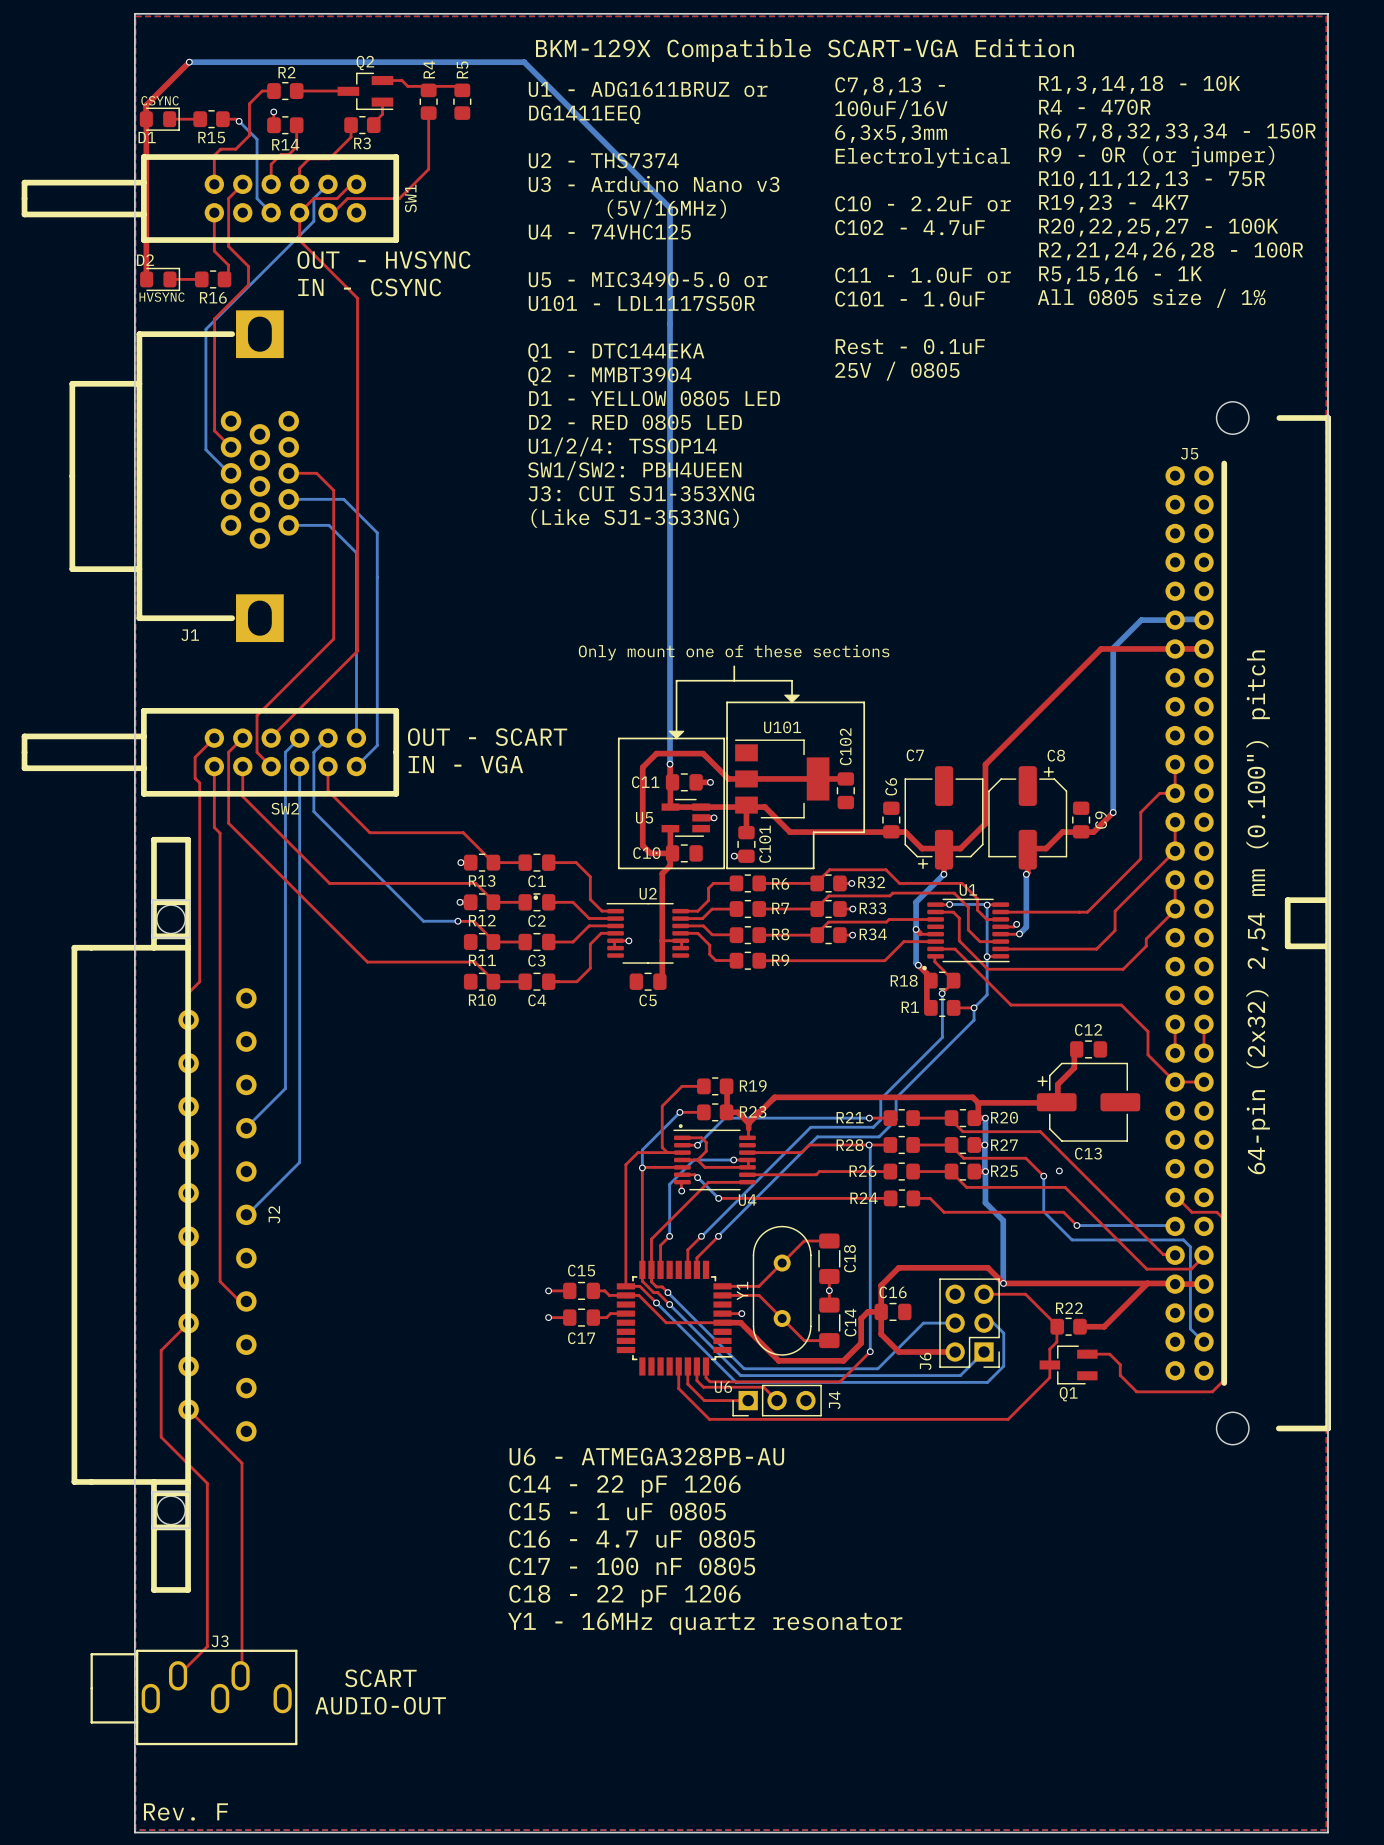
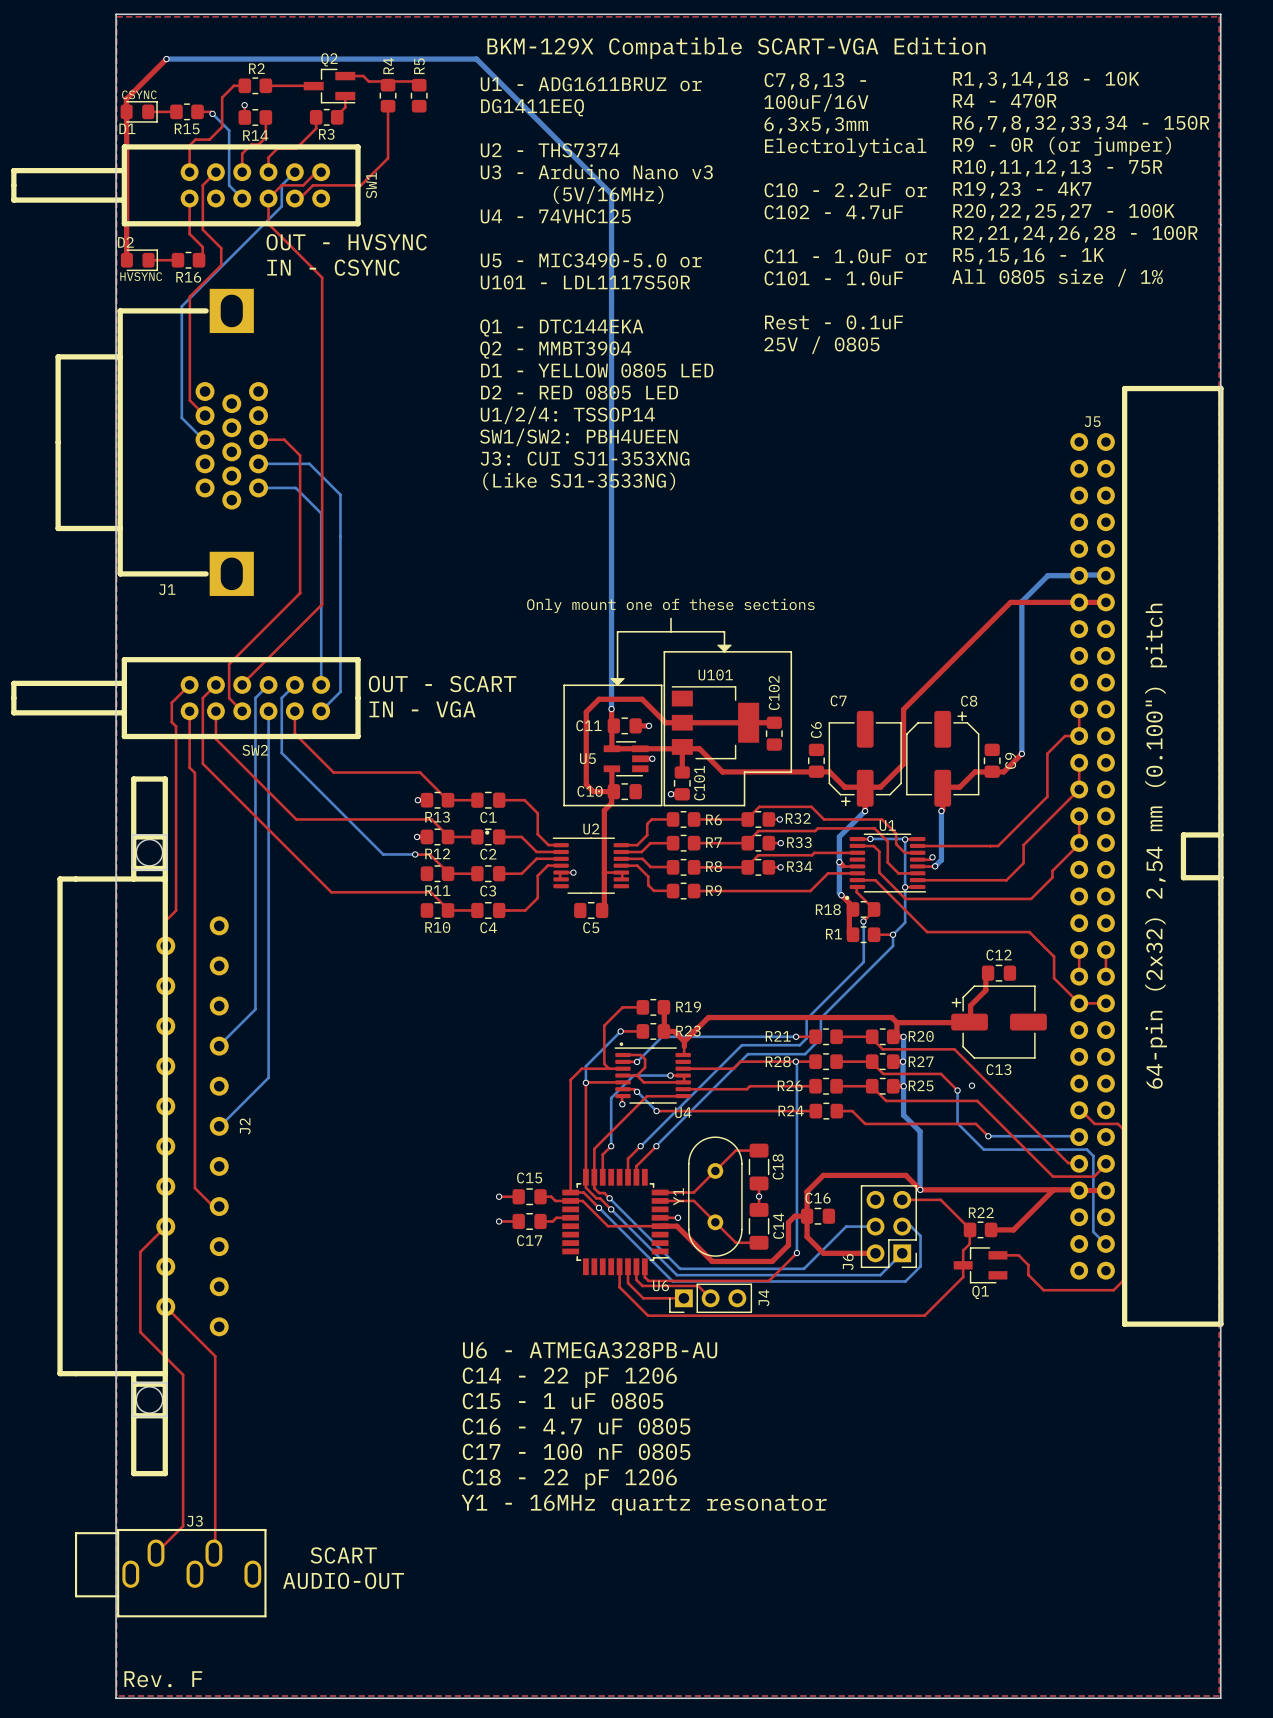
J5 footprint: [1165, 401, 1331, 1445] -> [1070, 385, 1224, 1327]

